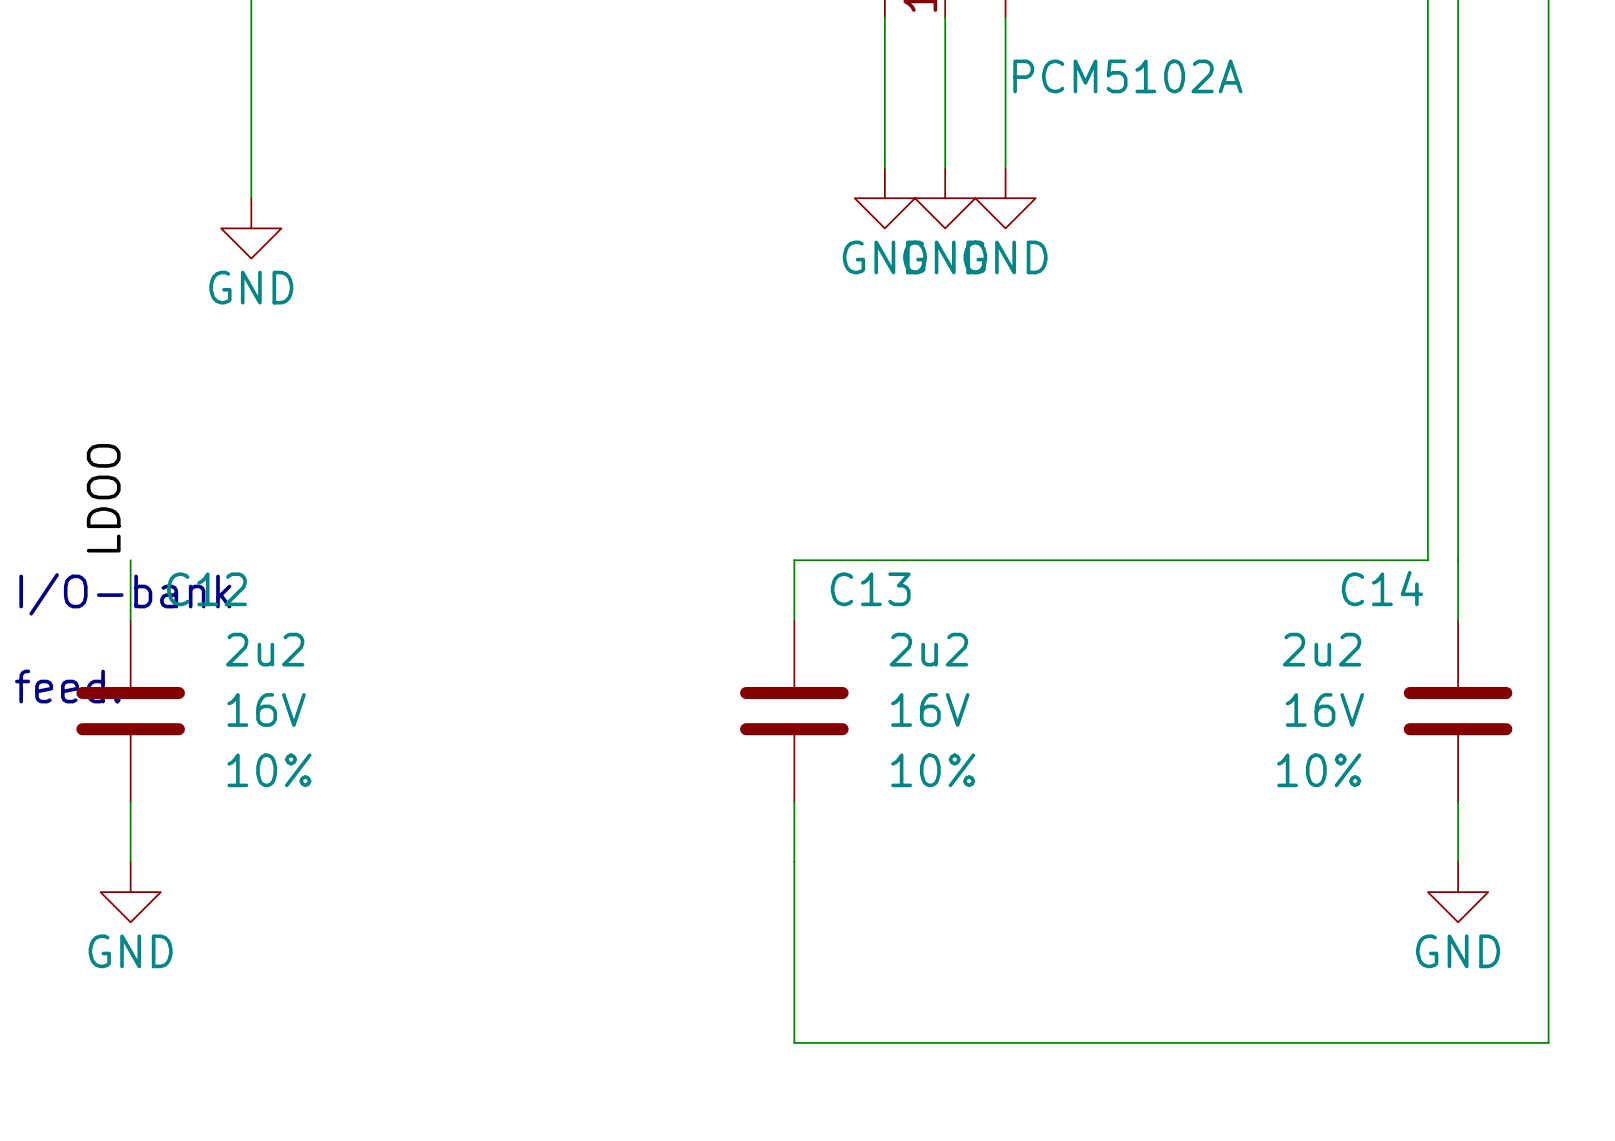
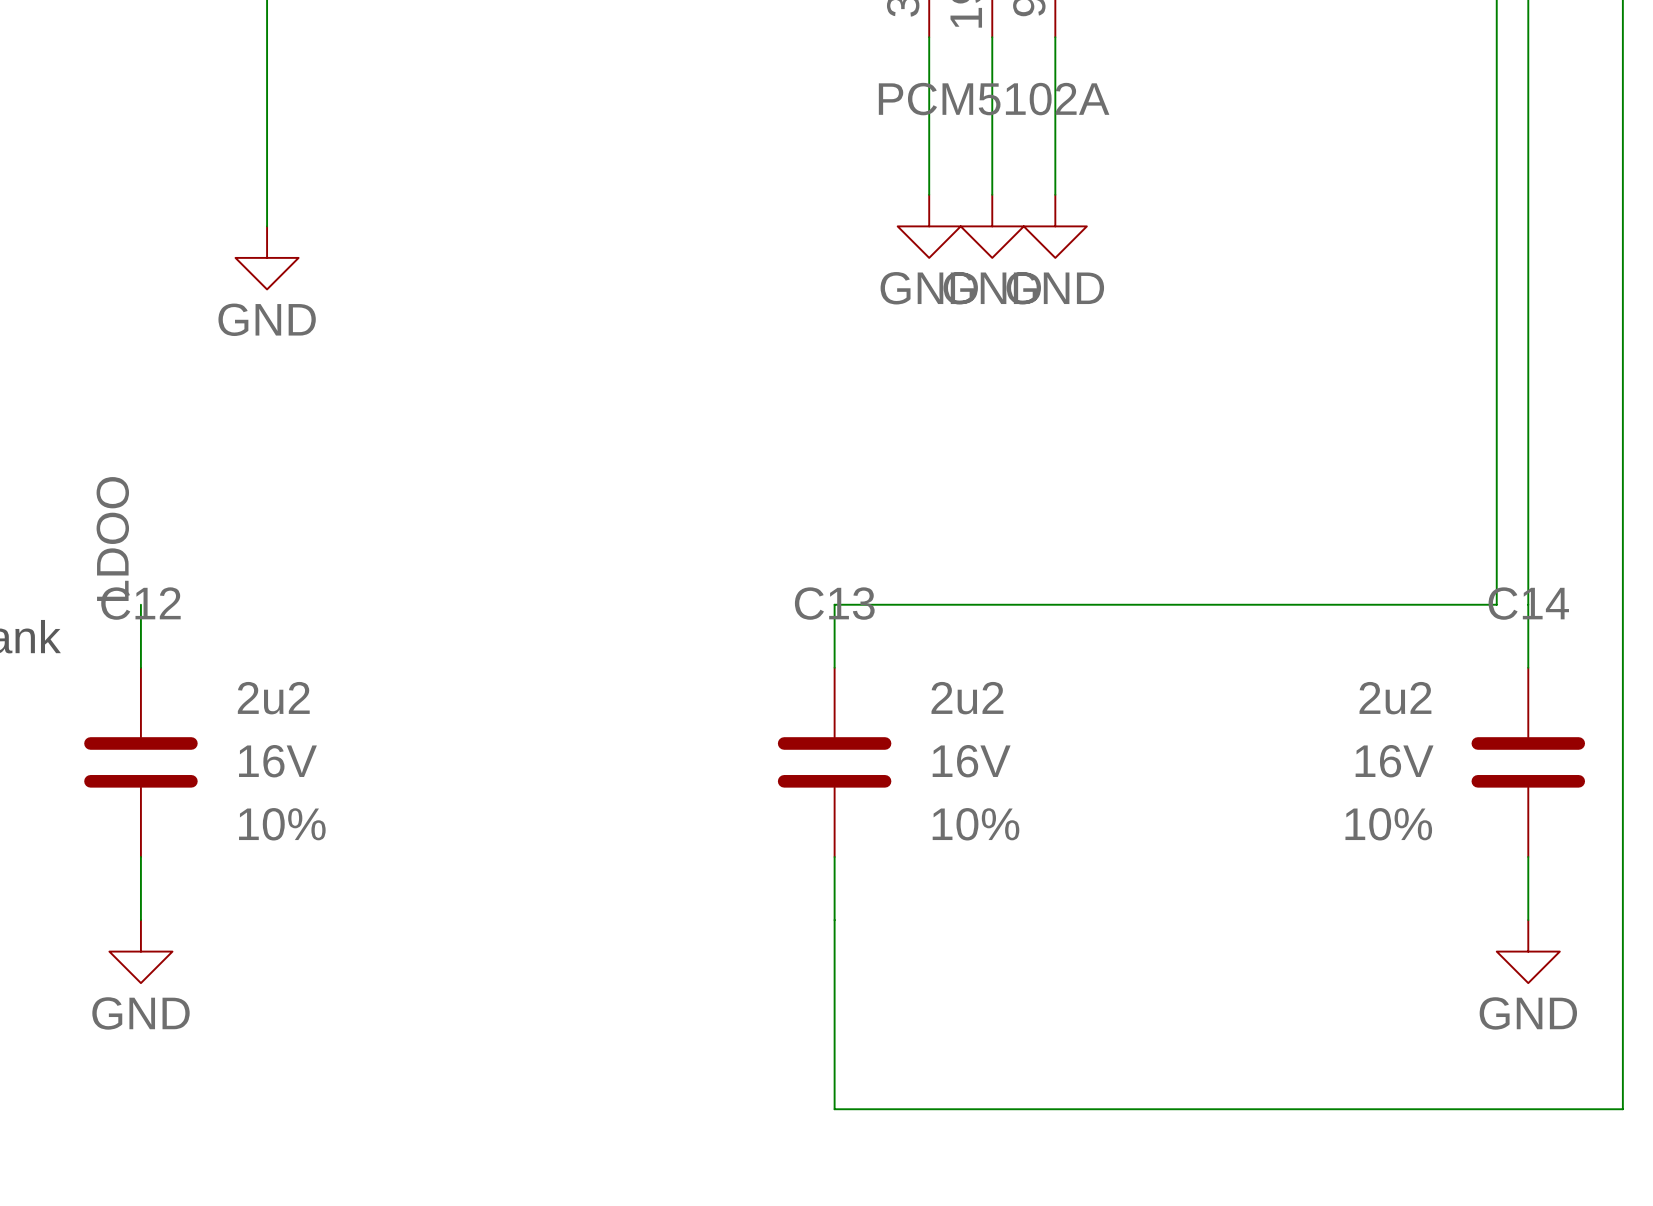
part value position: PCM5102A (1127, 76) -> PCM5102A (994, 99)
C14 name position: C14 (1382, 588) -> C14 (1528, 603)
C12 name position: C12 (207, 589) -> C12 (140, 603)
C13 name position: C13 (870, 589) -> C13 (834, 603)

